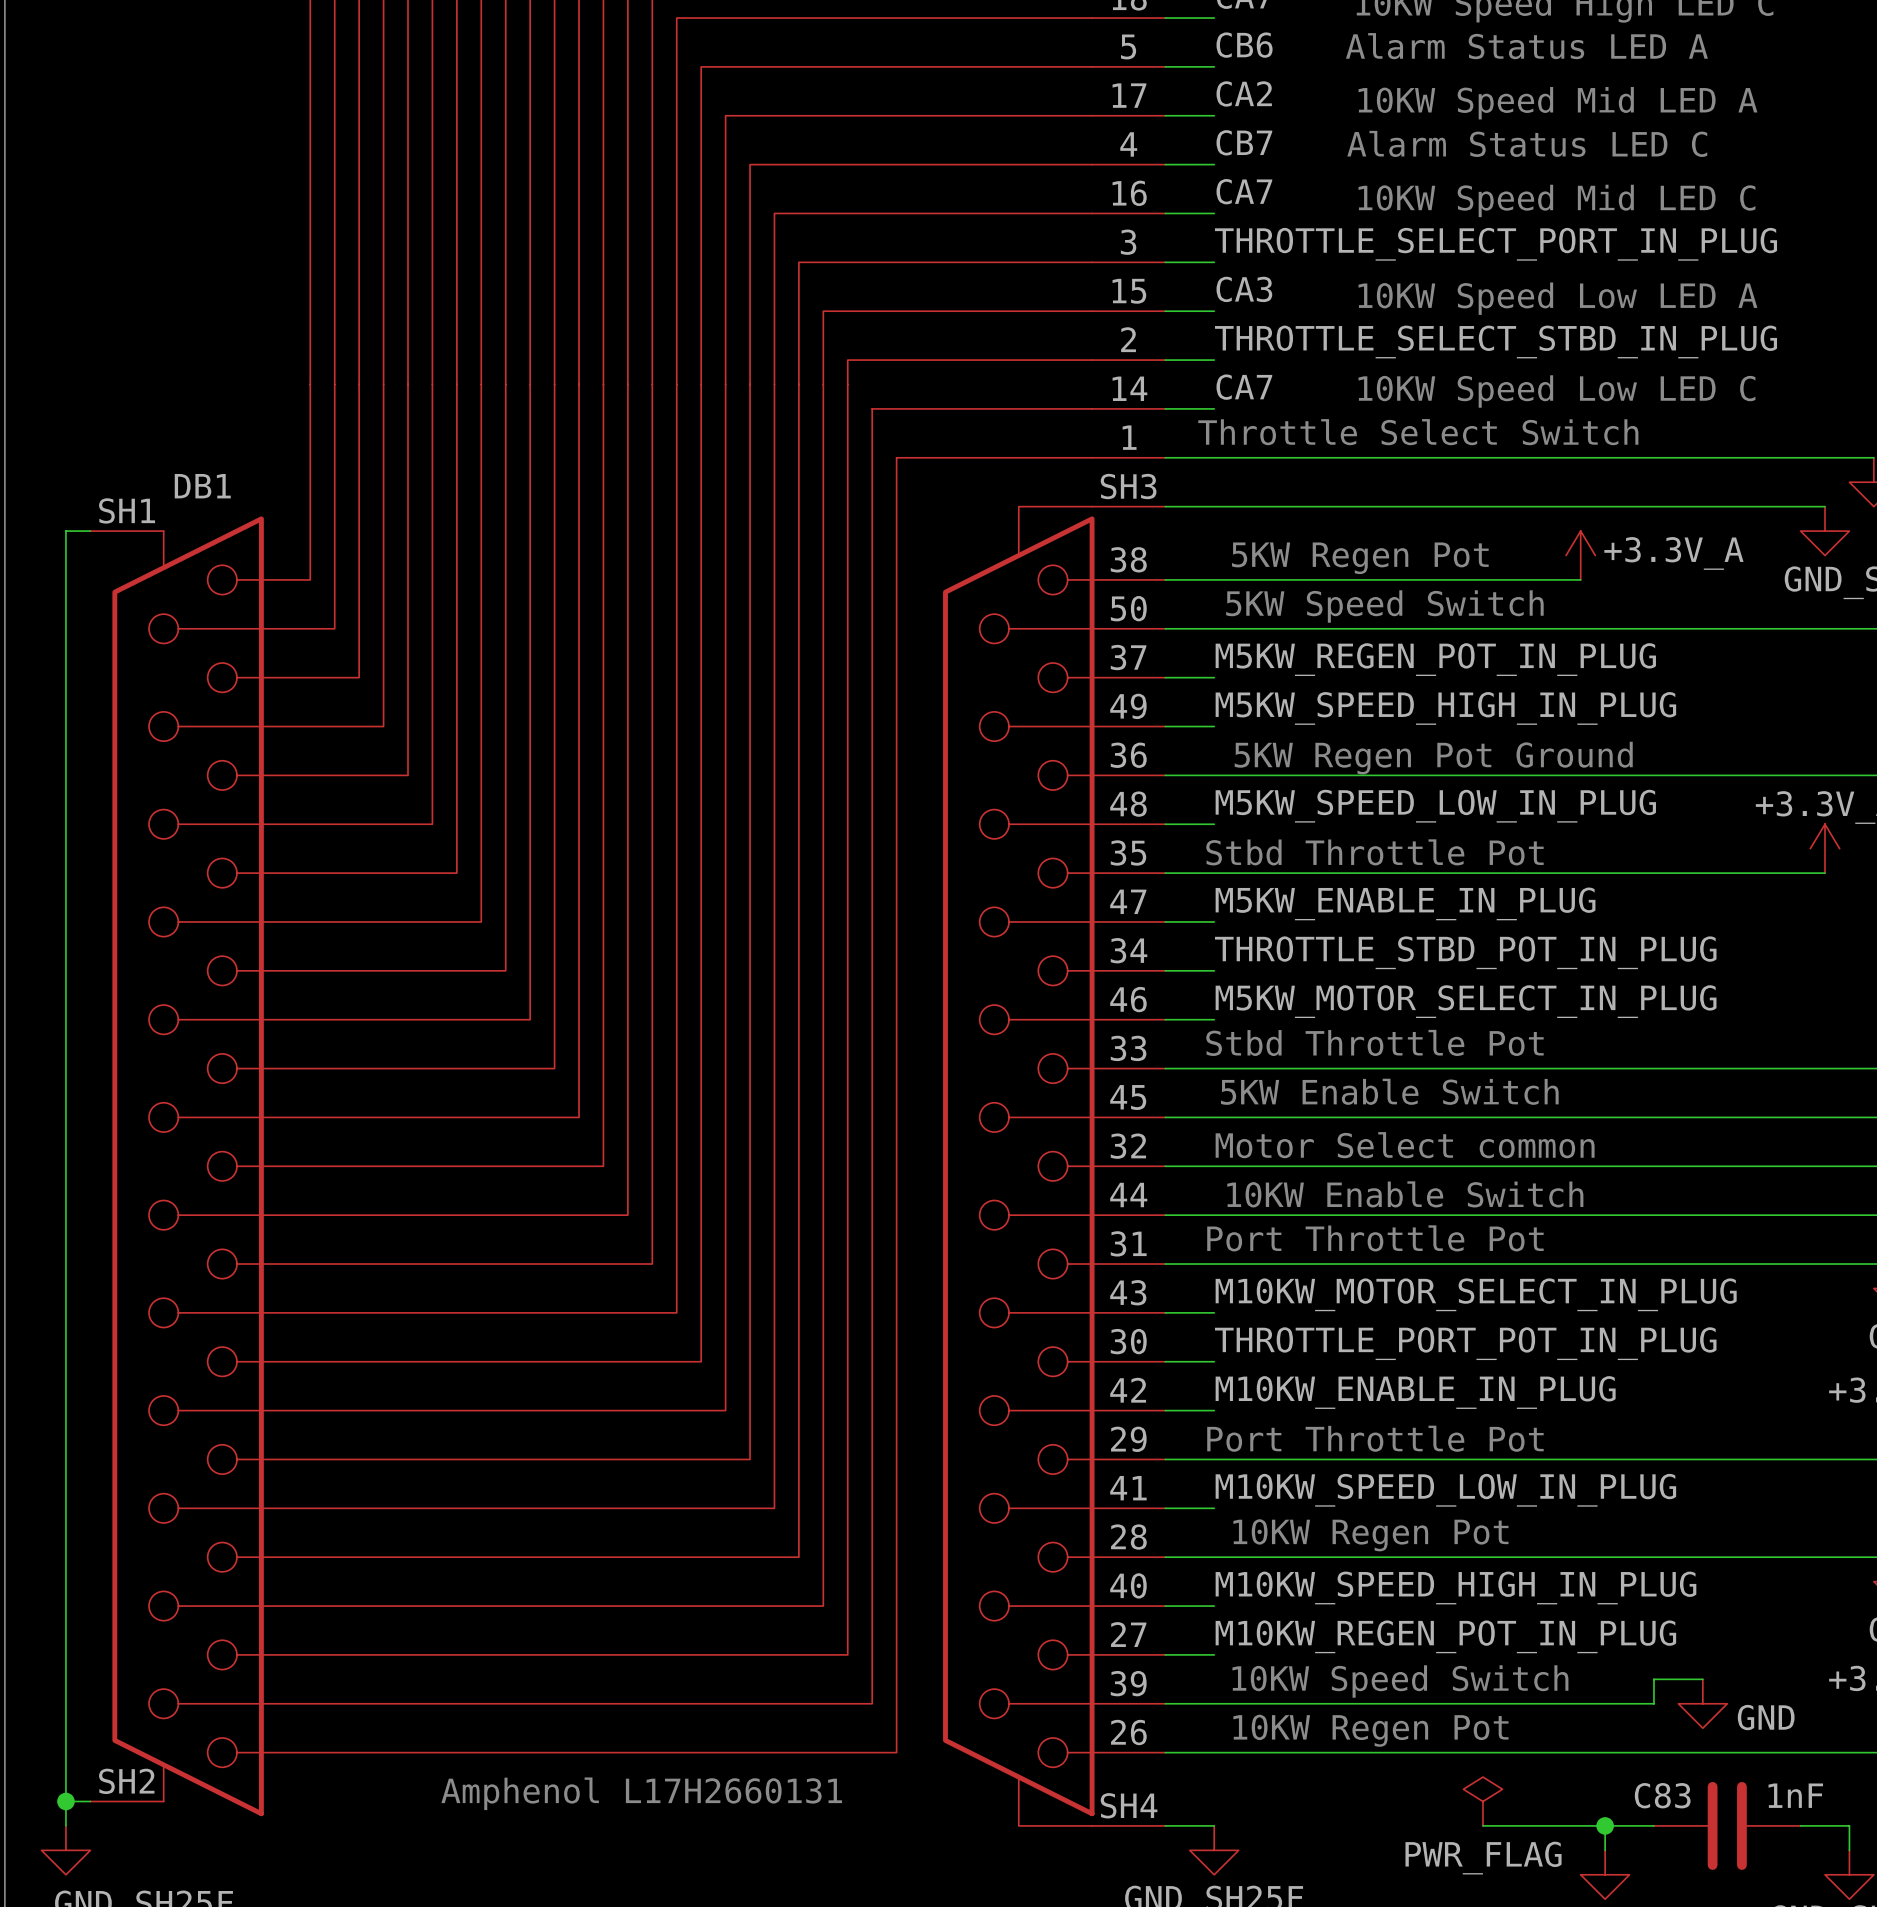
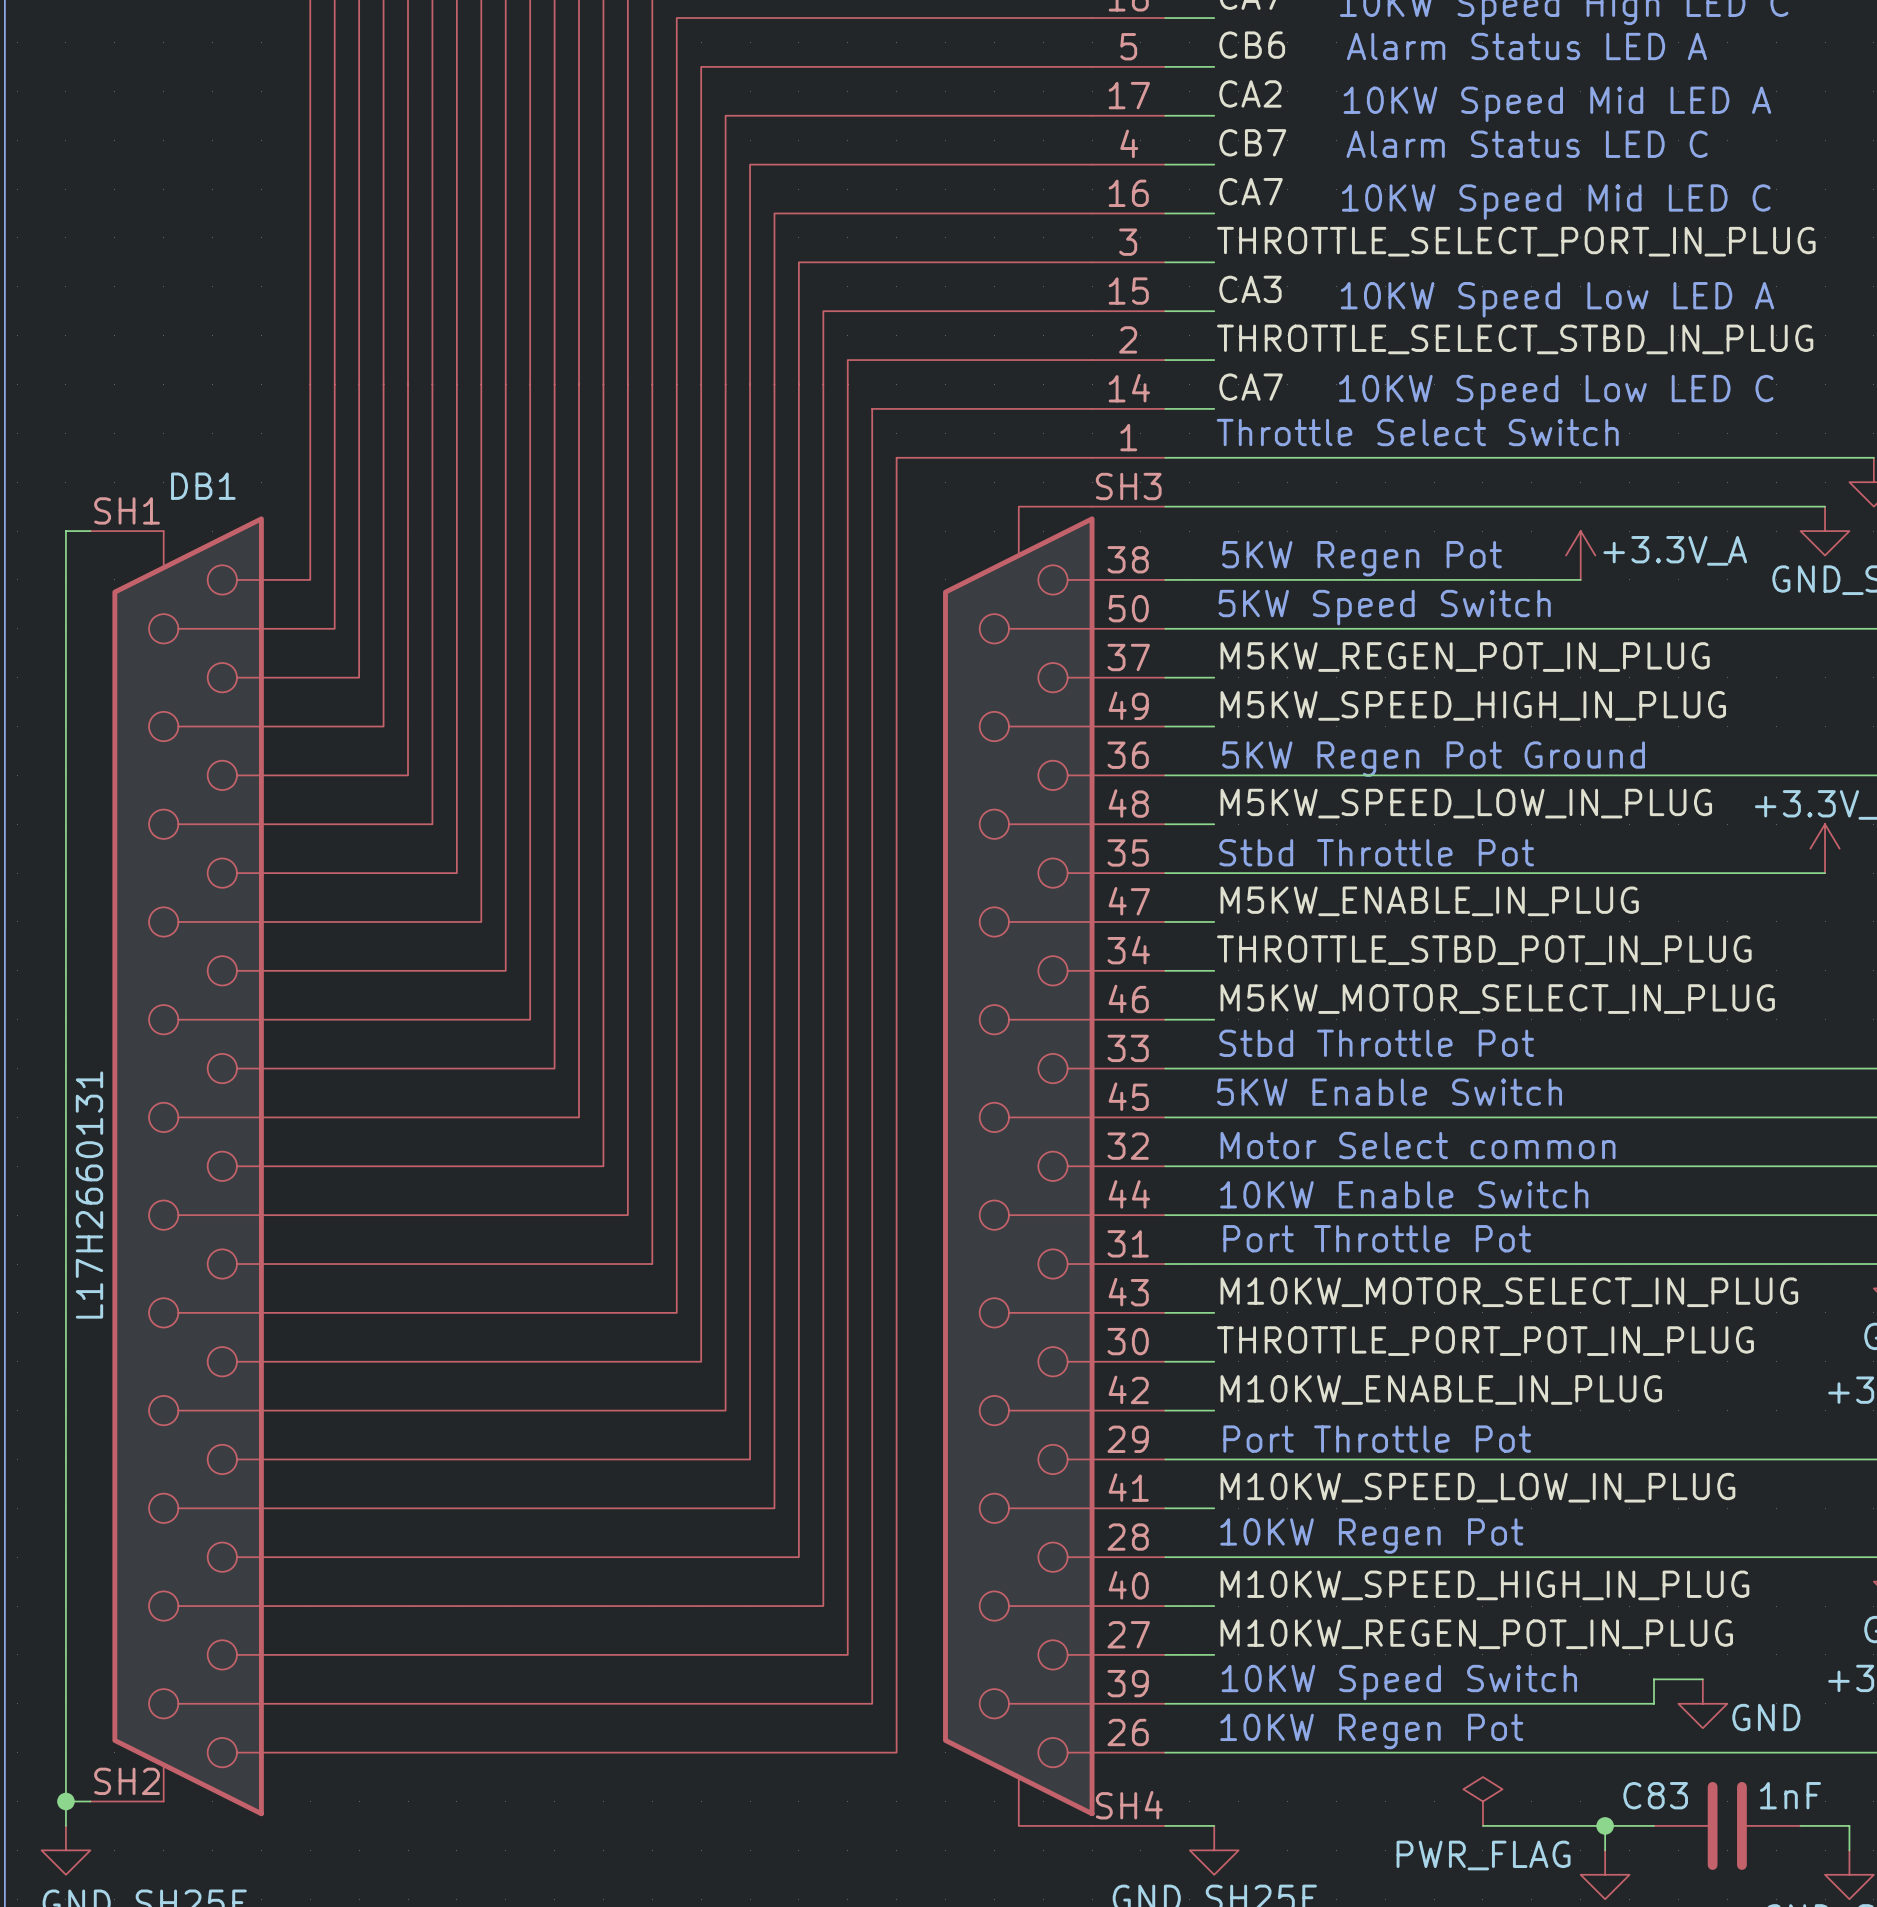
DB1 value: none -> L17H2660131 (89, 1195)
text: Amphenol L17H2660131 (641, 1793) -> none

